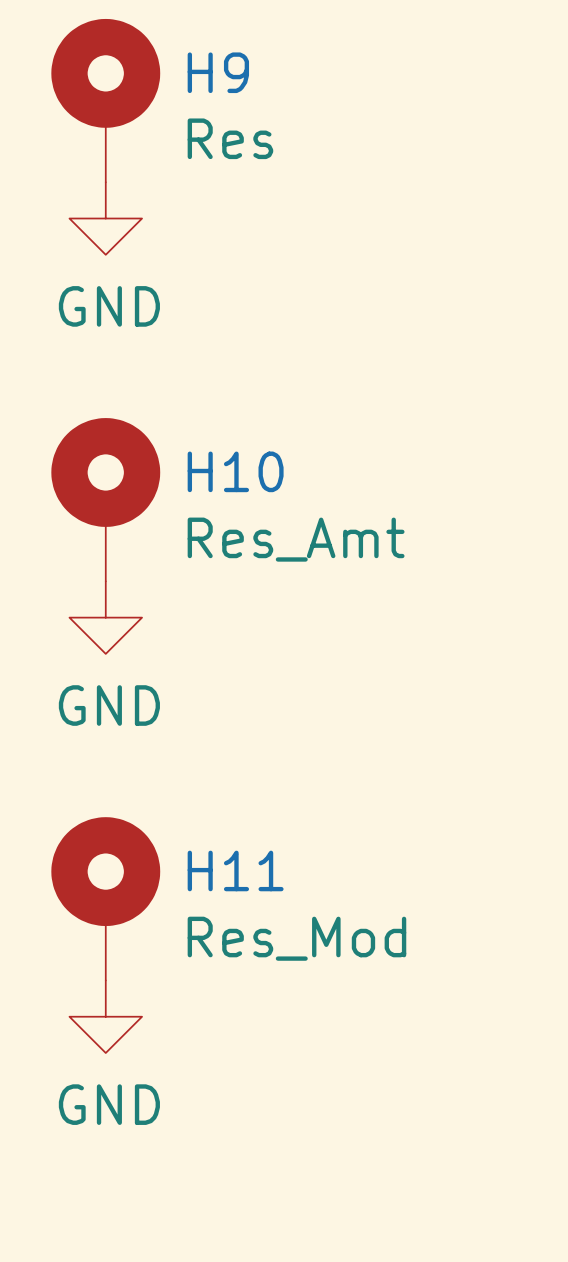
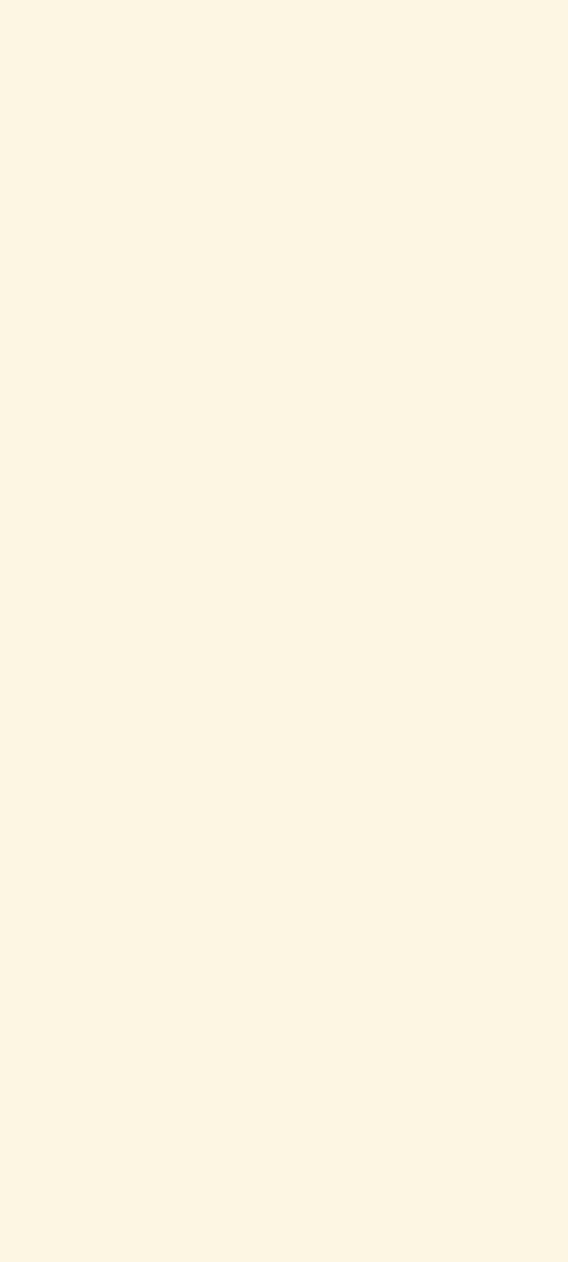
H9: Res (105, 100) -> none
power symbol: GND (105, 218) -> none
H10: Res_Amt (105, 499) -> none
power symbol: GND (105, 617) -> none
H11: Res_Mod (105, 898) -> none
power symbol: GND (105, 1016) -> none

